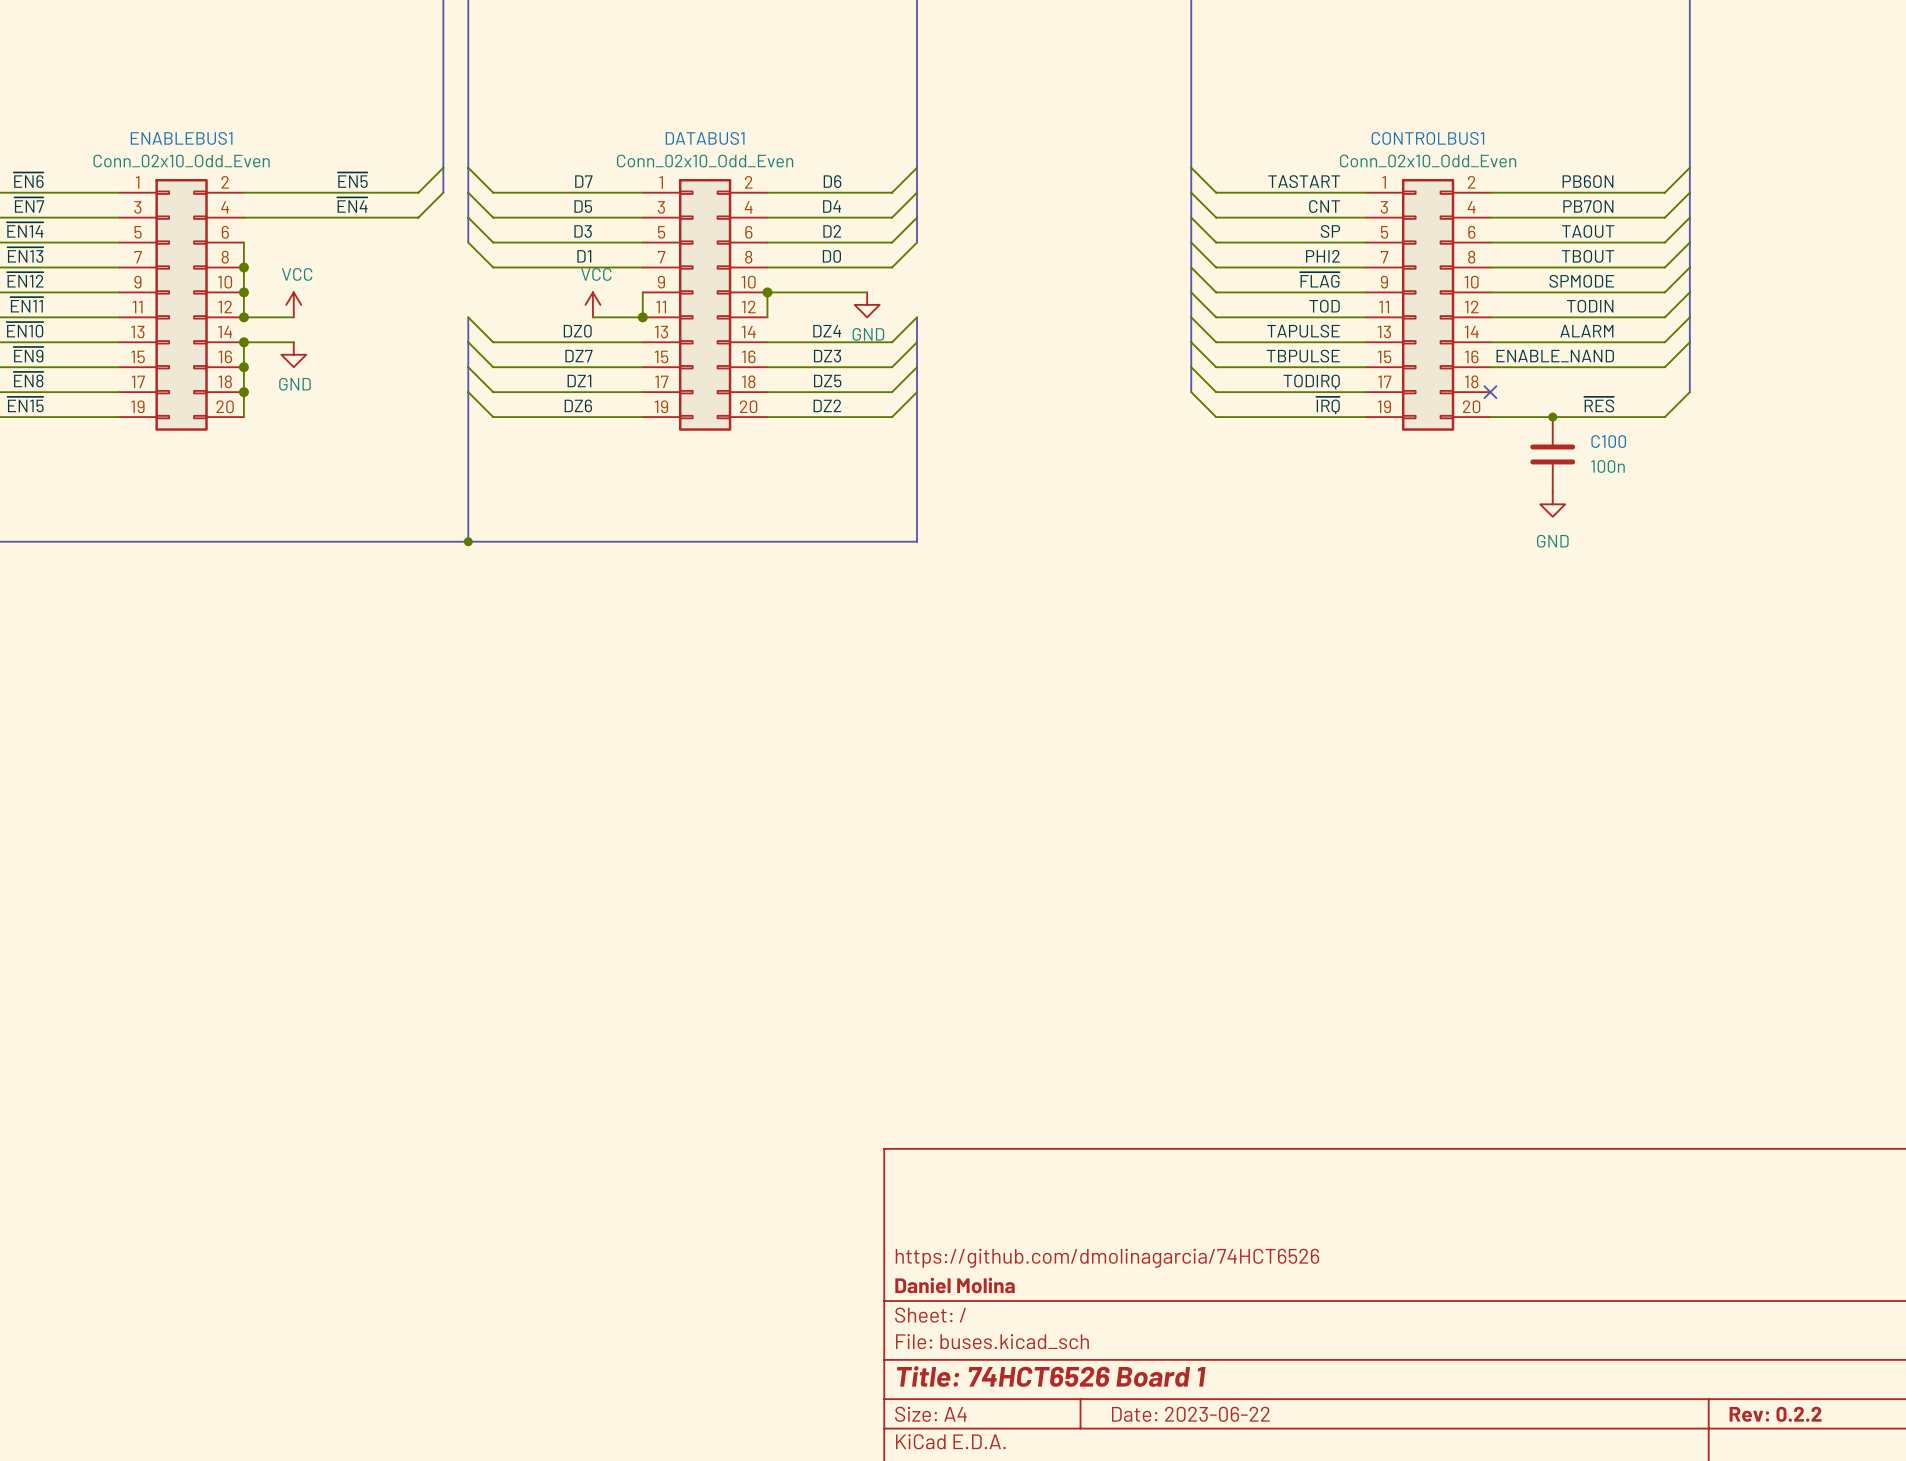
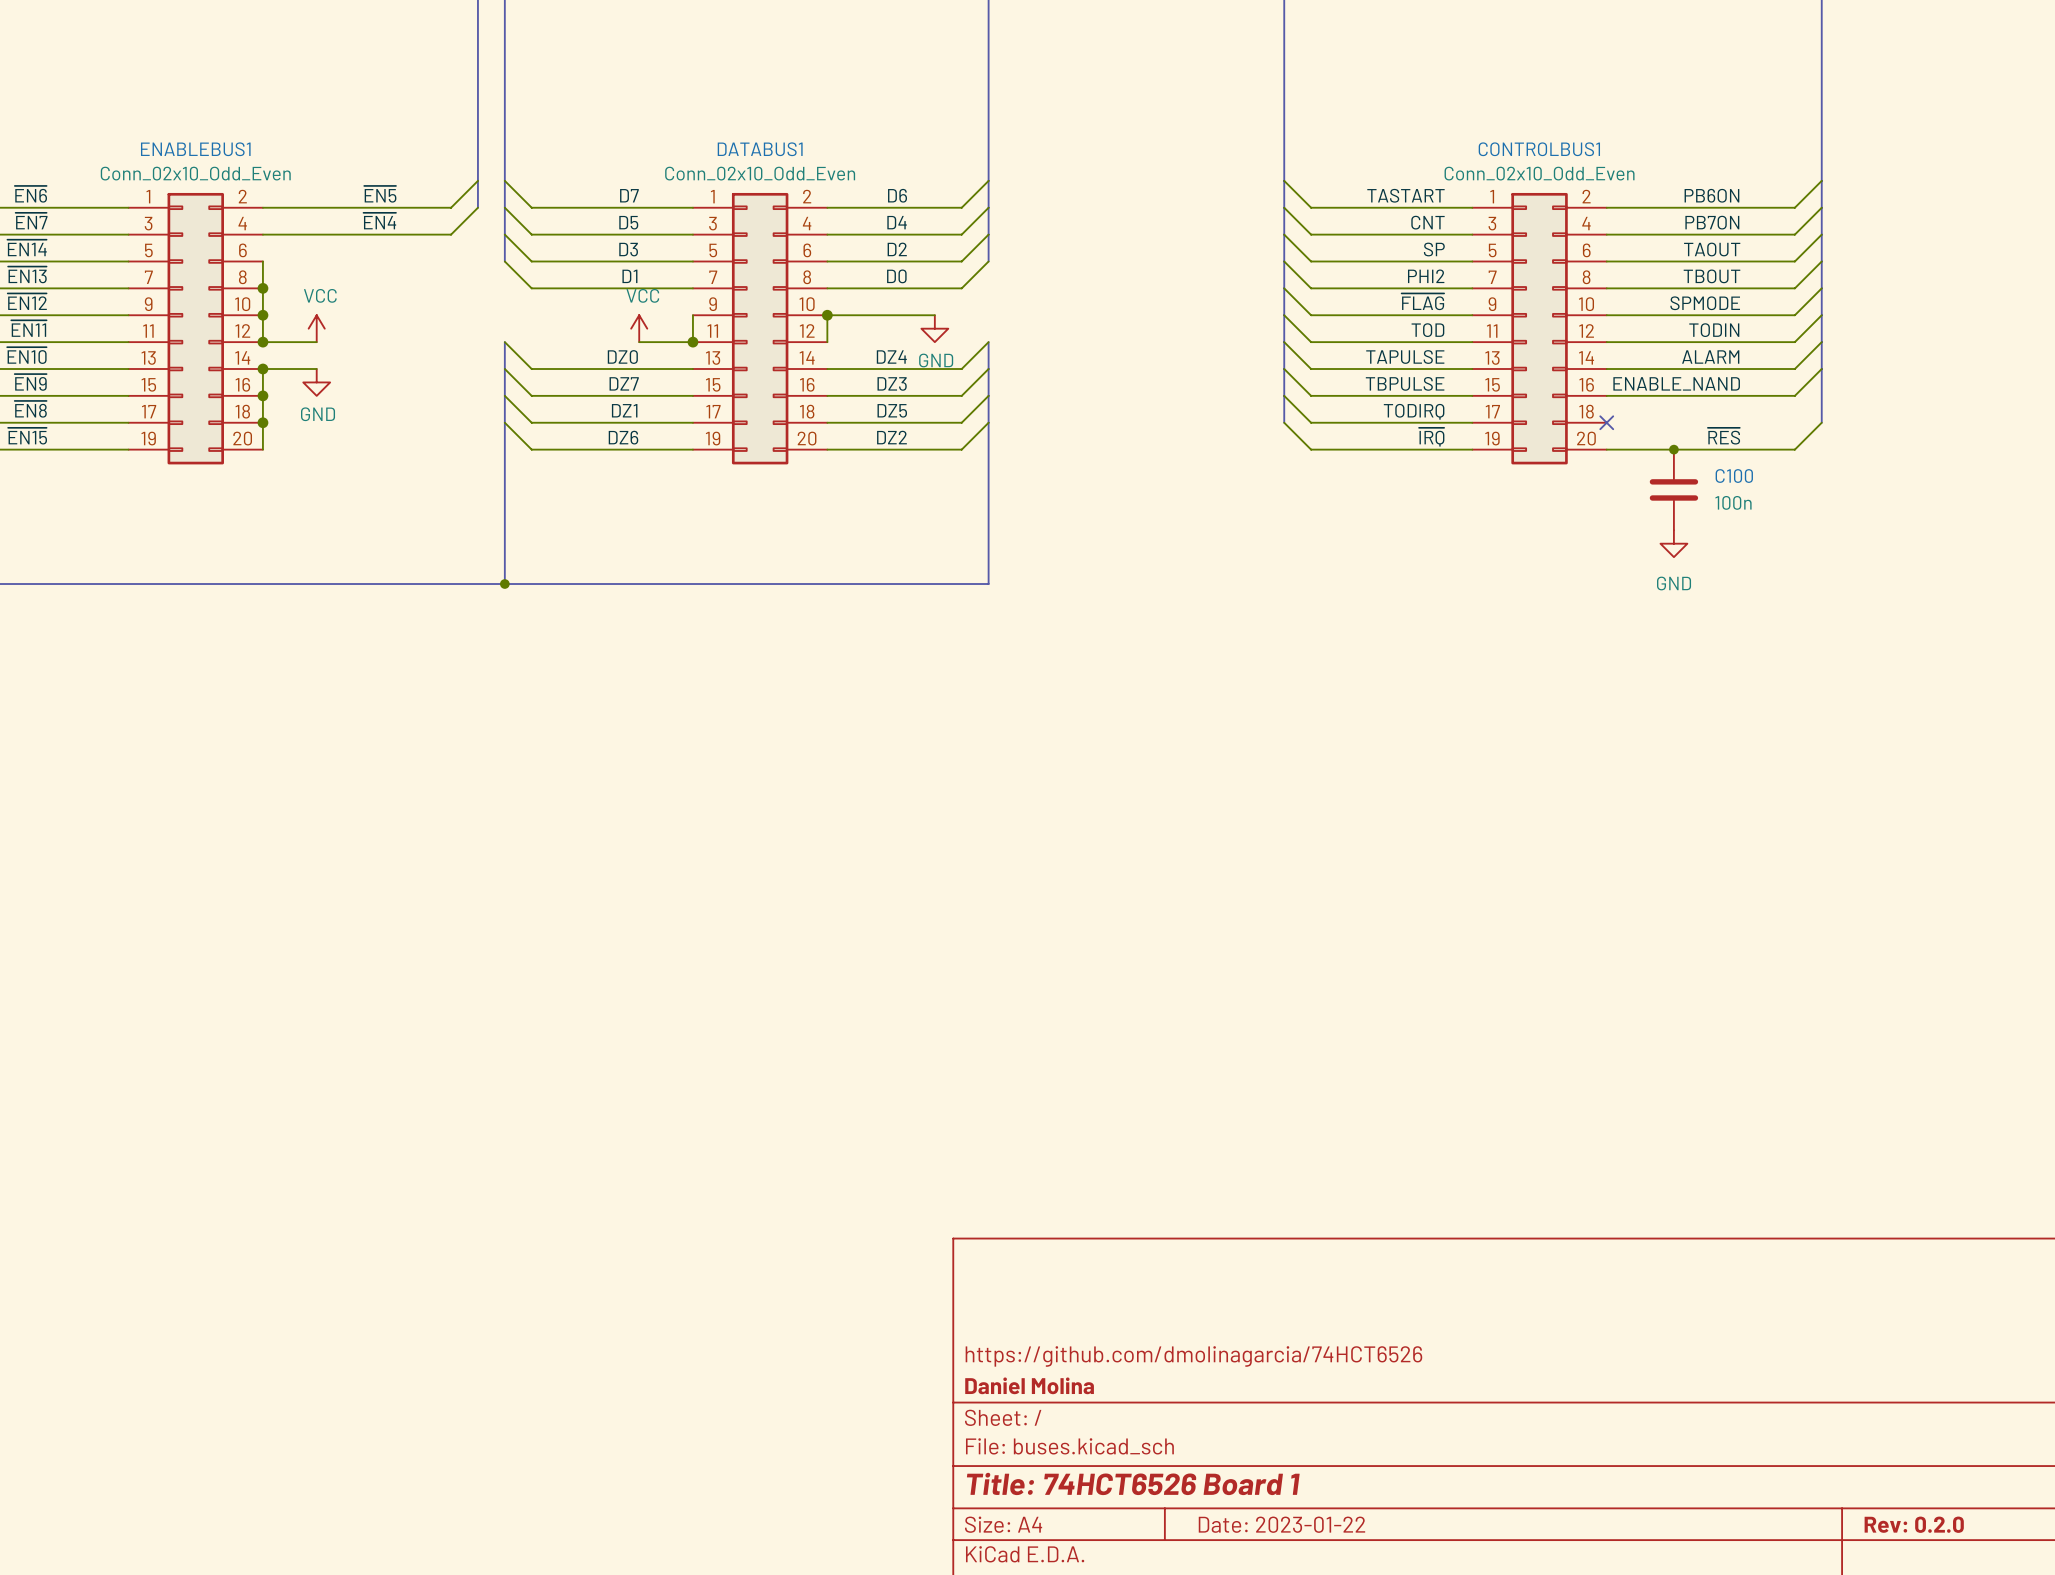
title block: Date: 2023-06-22 (1190, 1414) -> Date: 2023-01-22 (1281, 1524)
title block: Rev: 0.2.2 (1775, 1414) -> Rev: 0.2.0 (1914, 1524)

